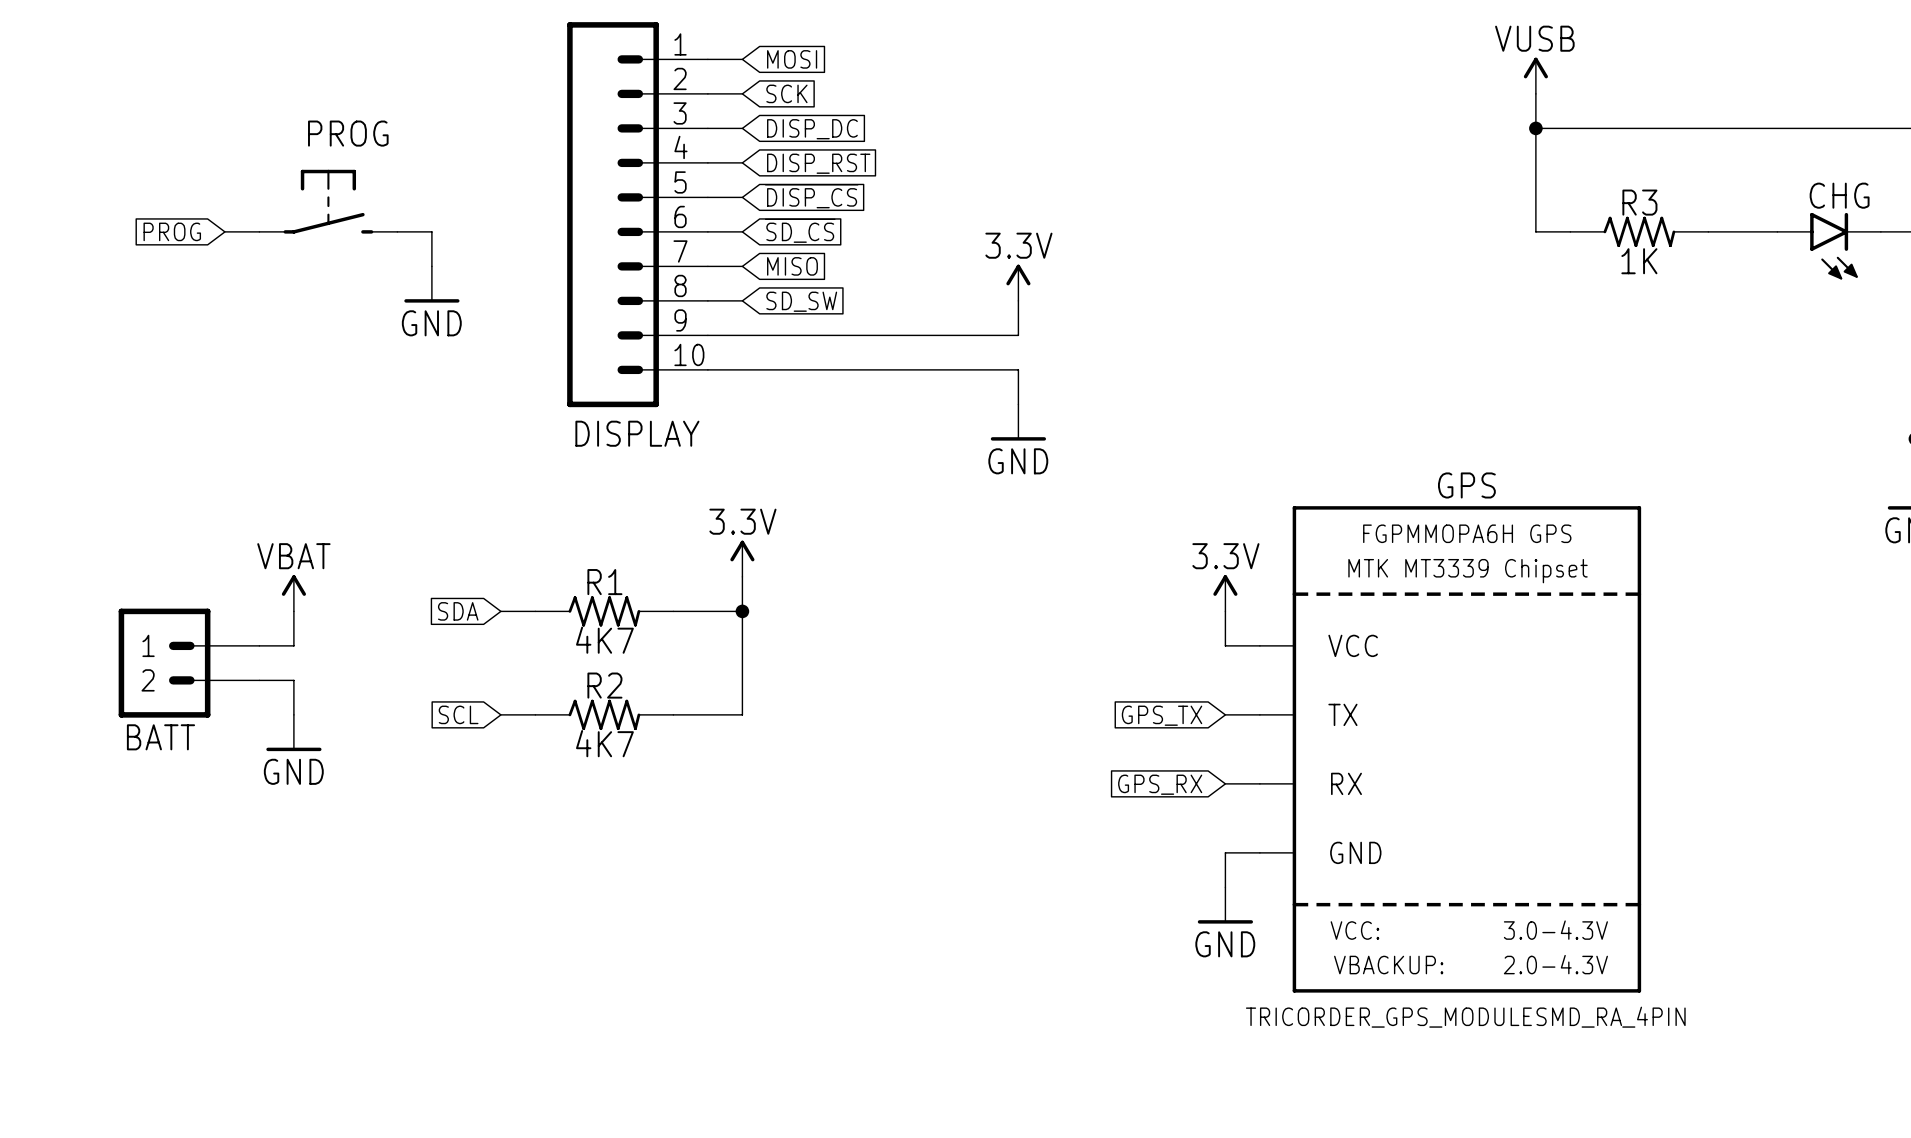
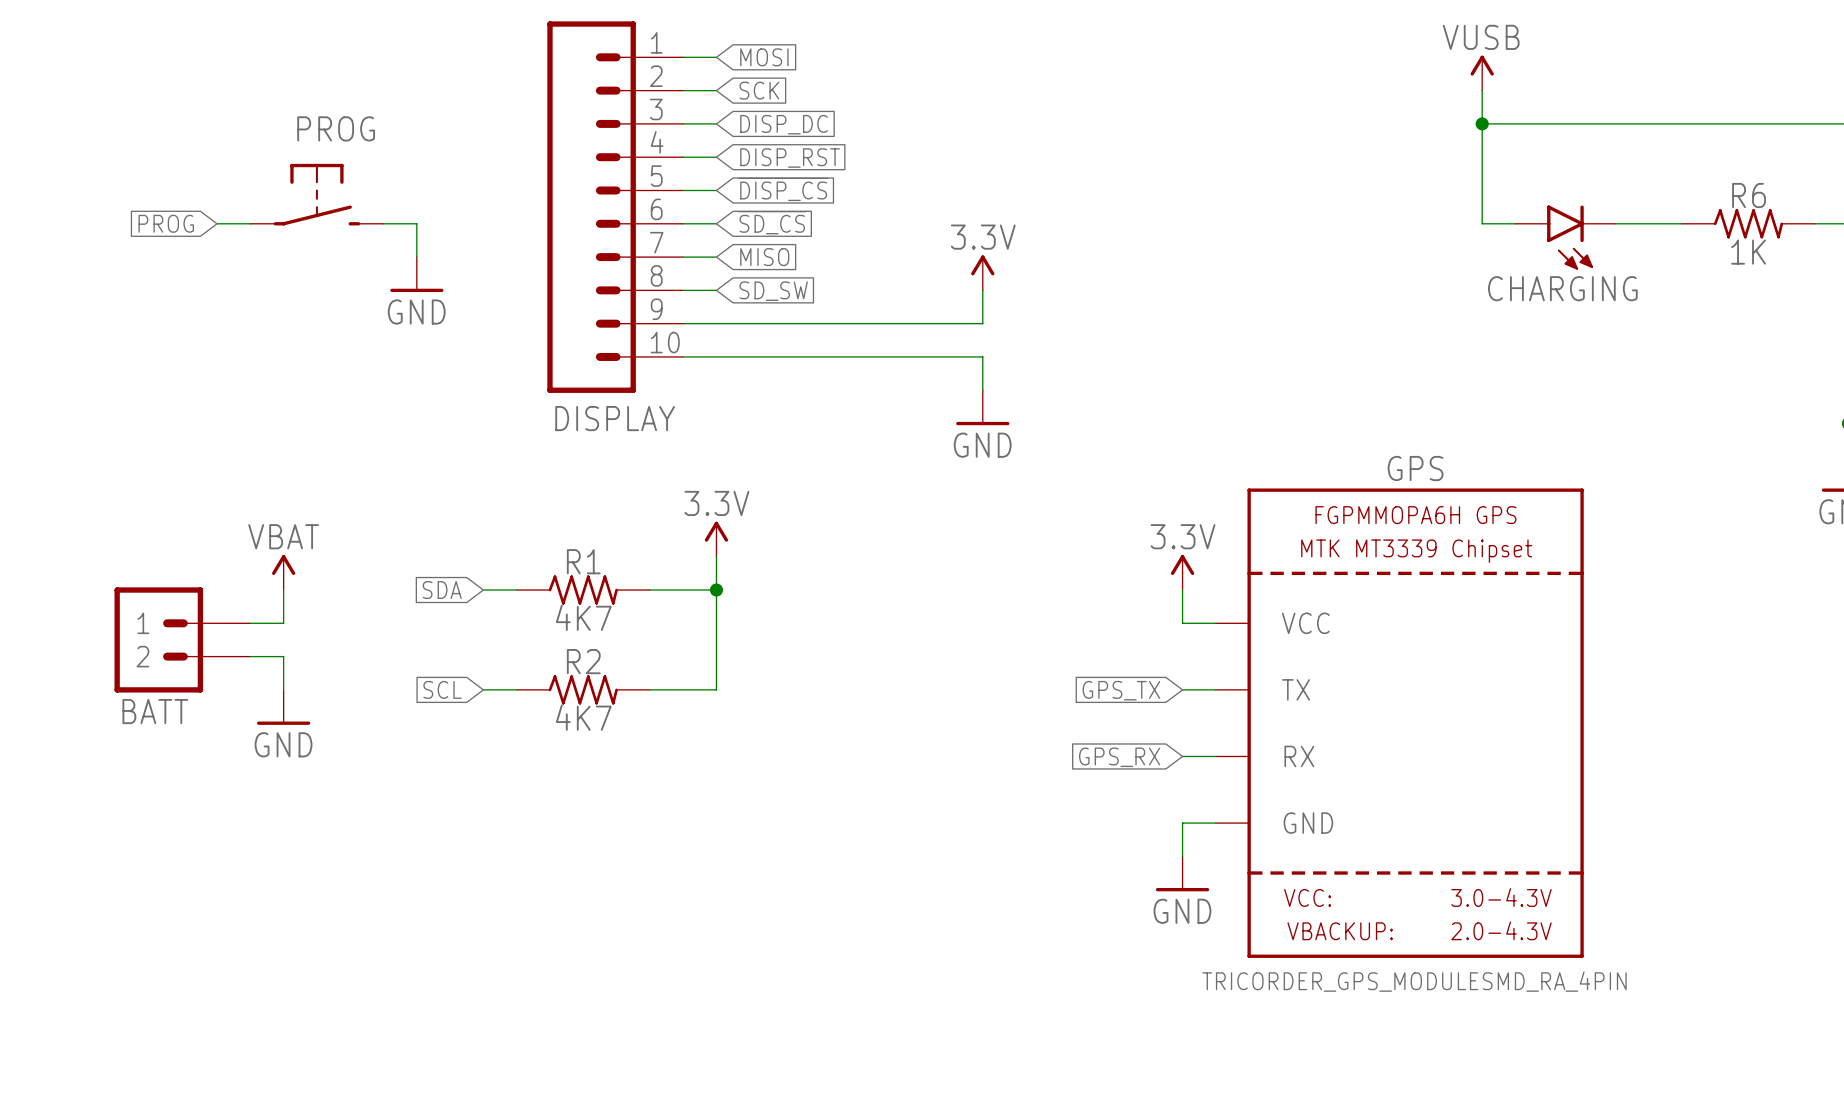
R3: 1K (1639, 231) -> none
R6: none -> 1K (1748, 223)
CHARGING: none -> (1565, 237)
CHG: (1829, 246) -> none

